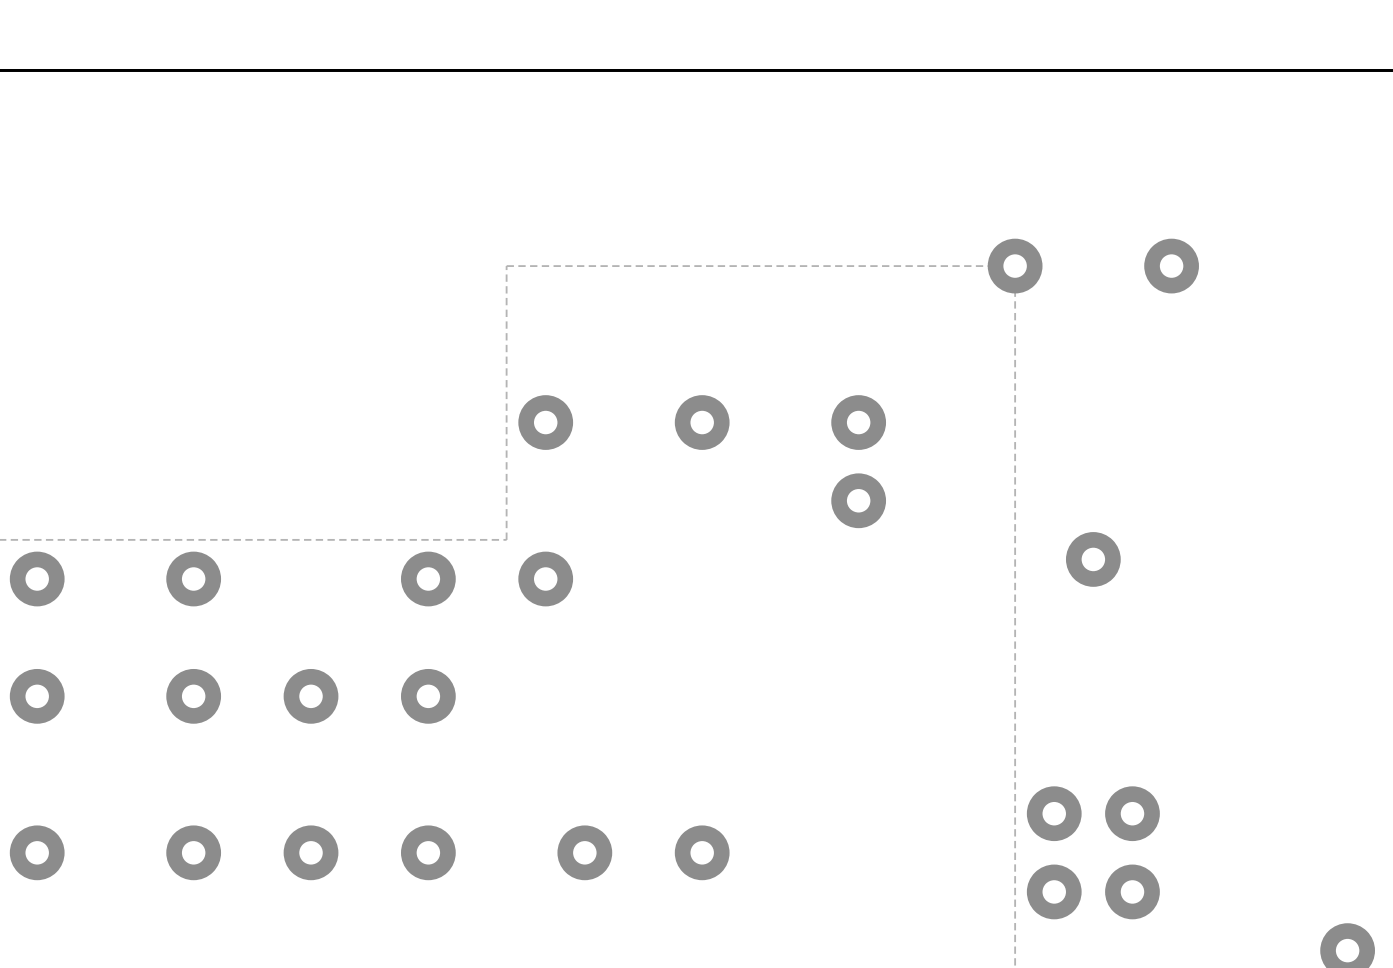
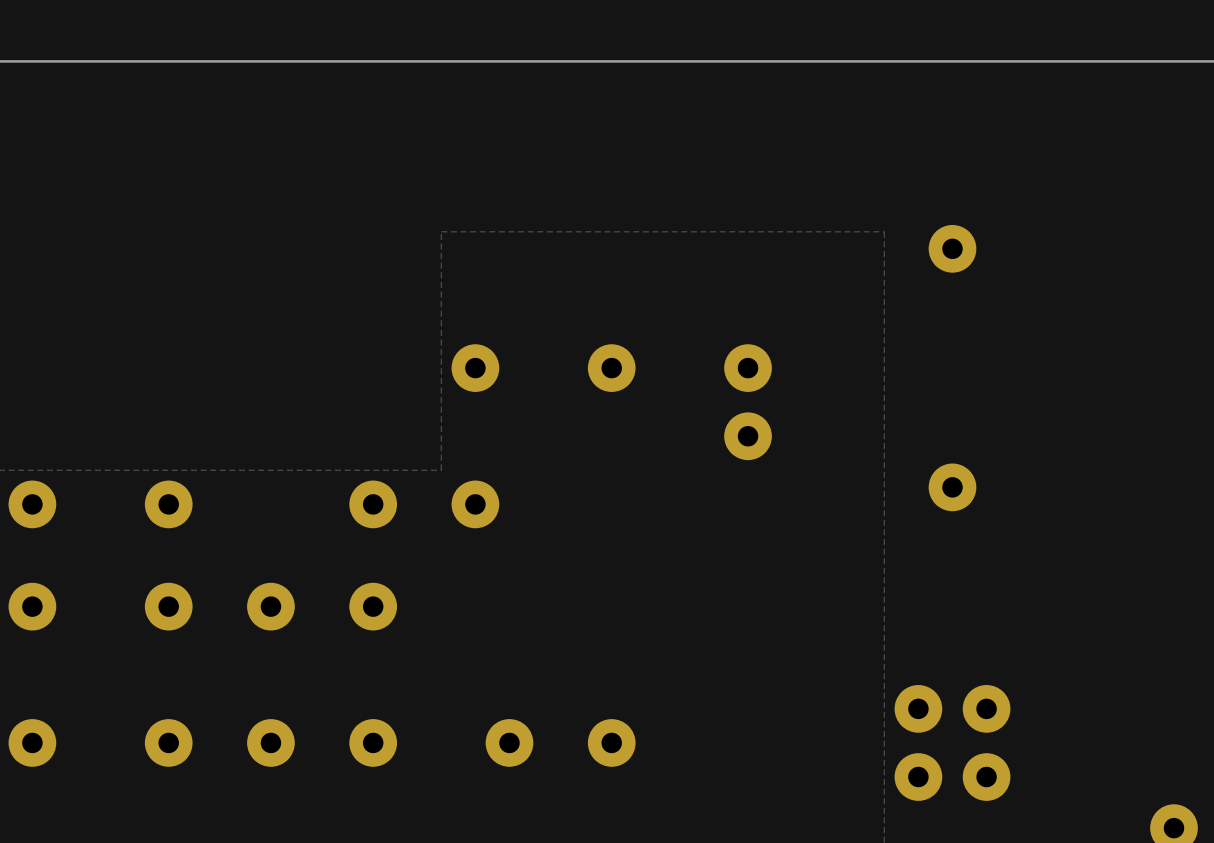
via: (1015, 266) -> none
via: (1171, 266) -> none
via: none -> (952, 248)

